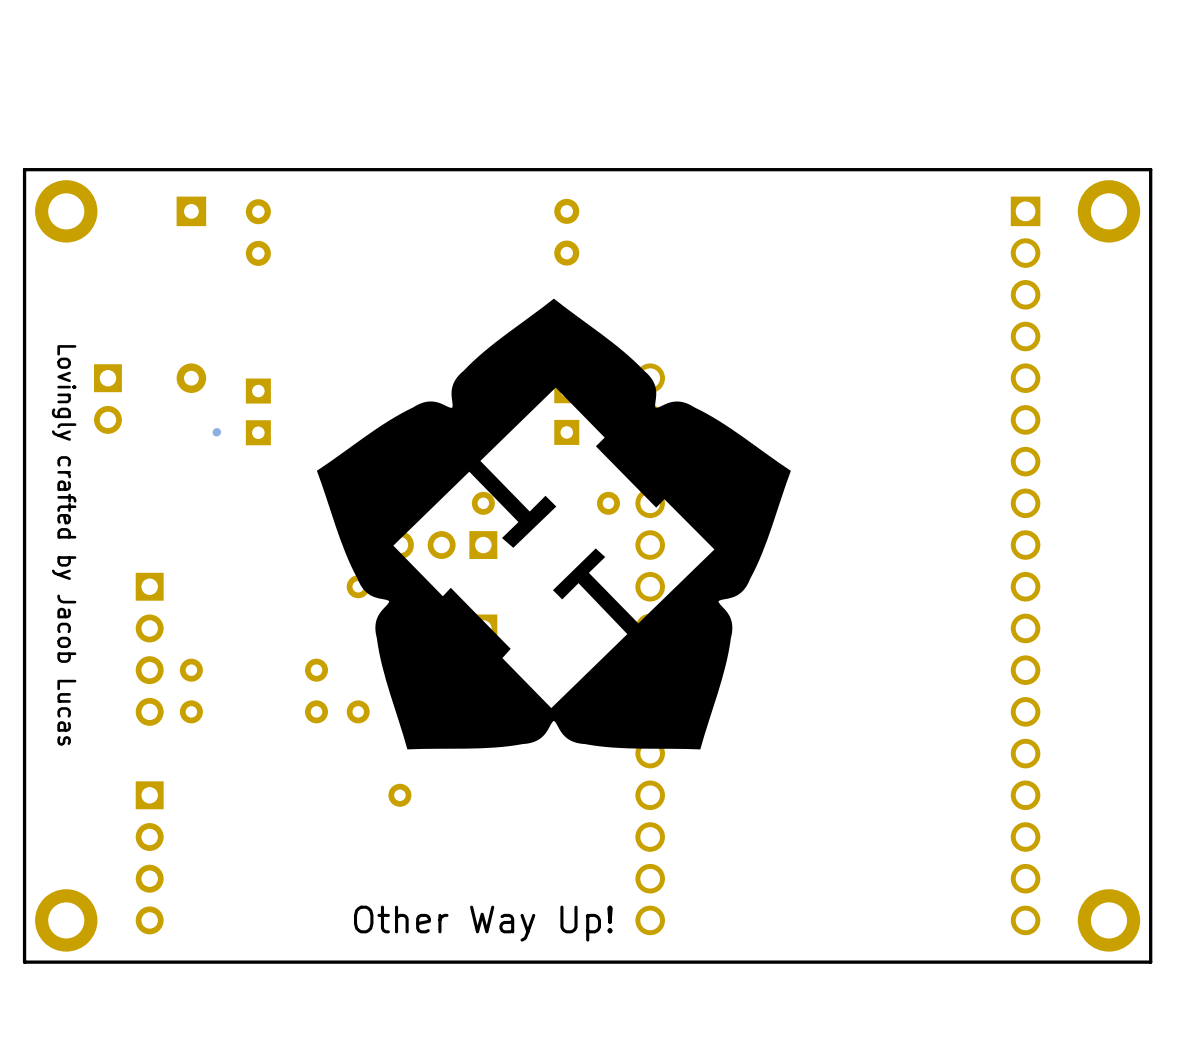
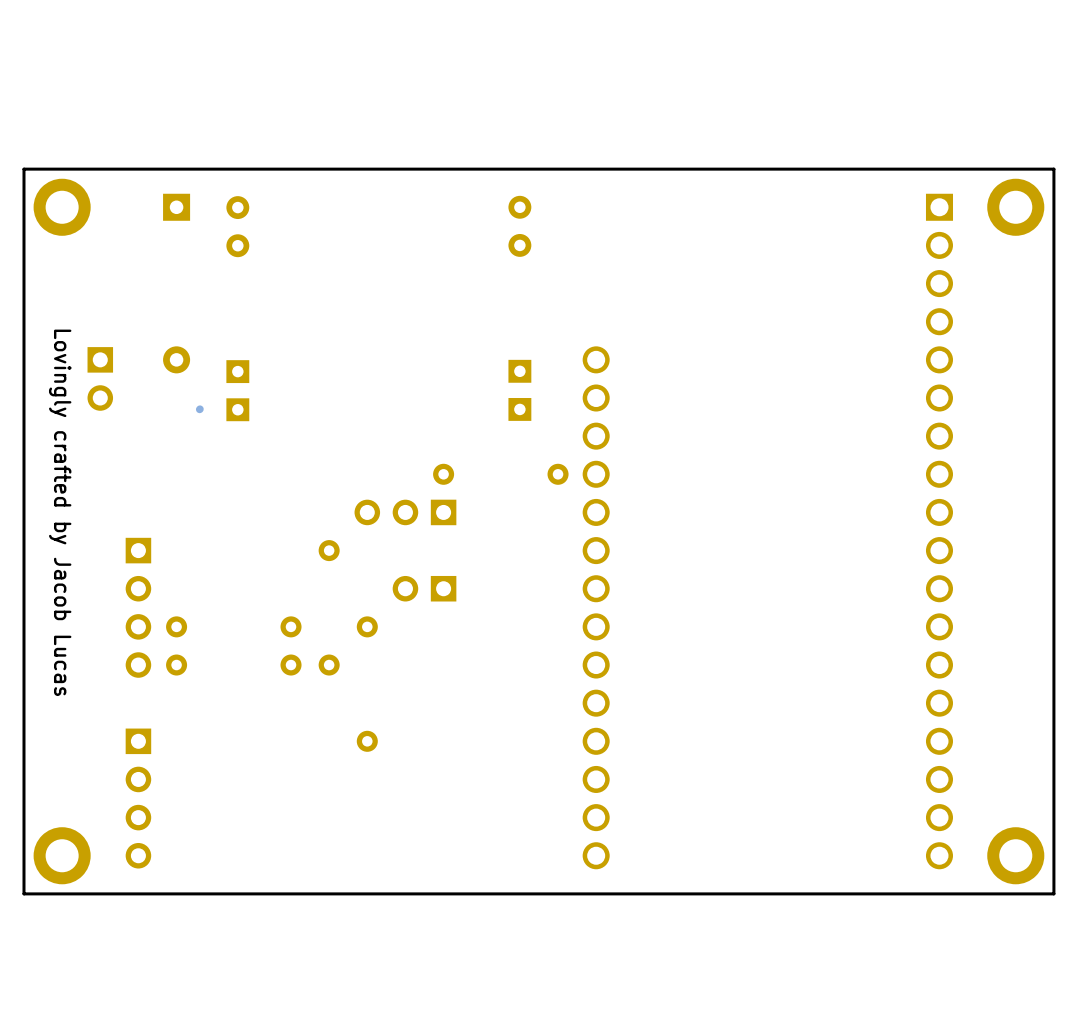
drawing: [316, 298, 791, 750] -> none
text: Other Way Up! (483, 923) -> none

